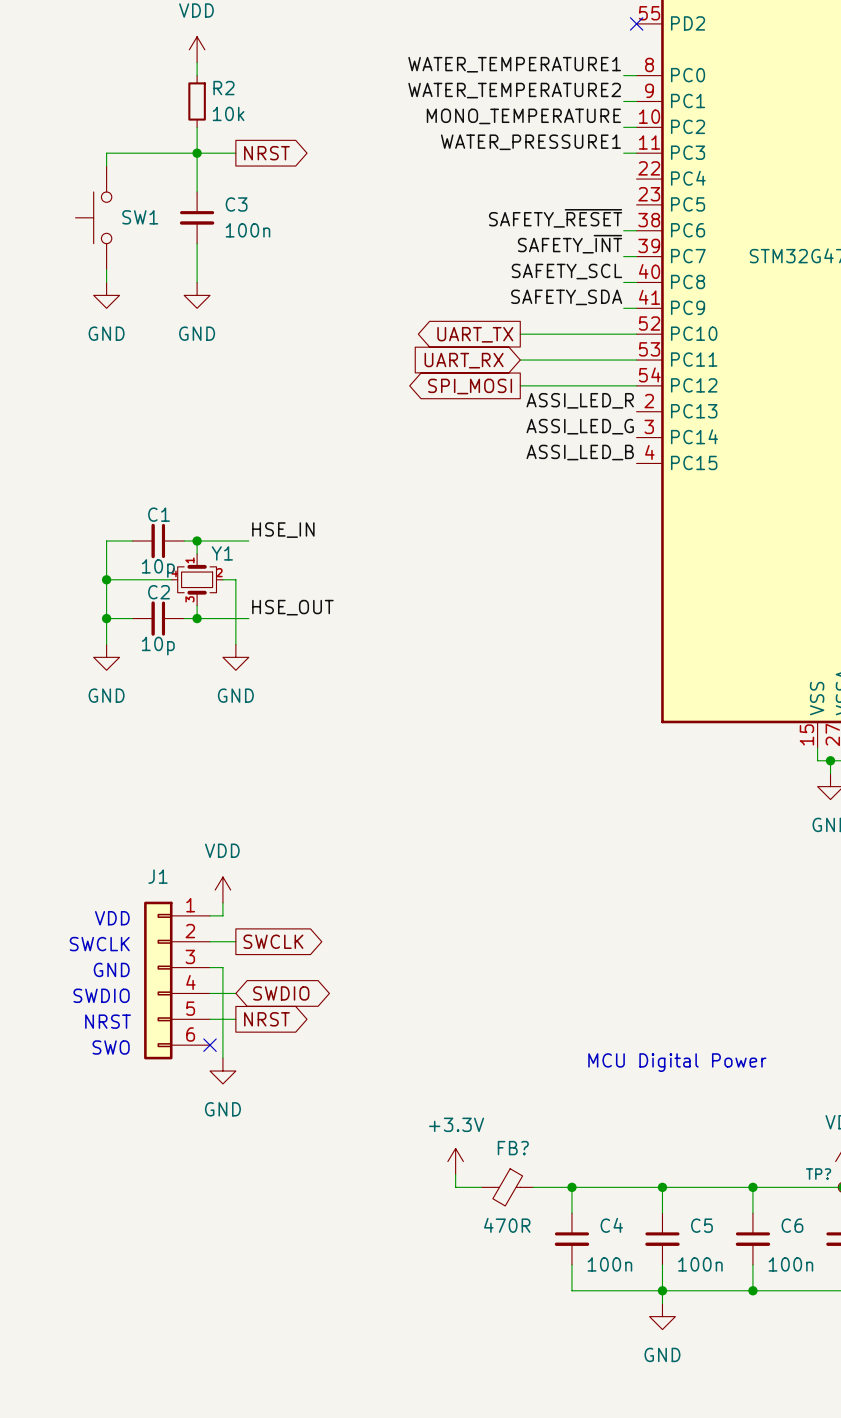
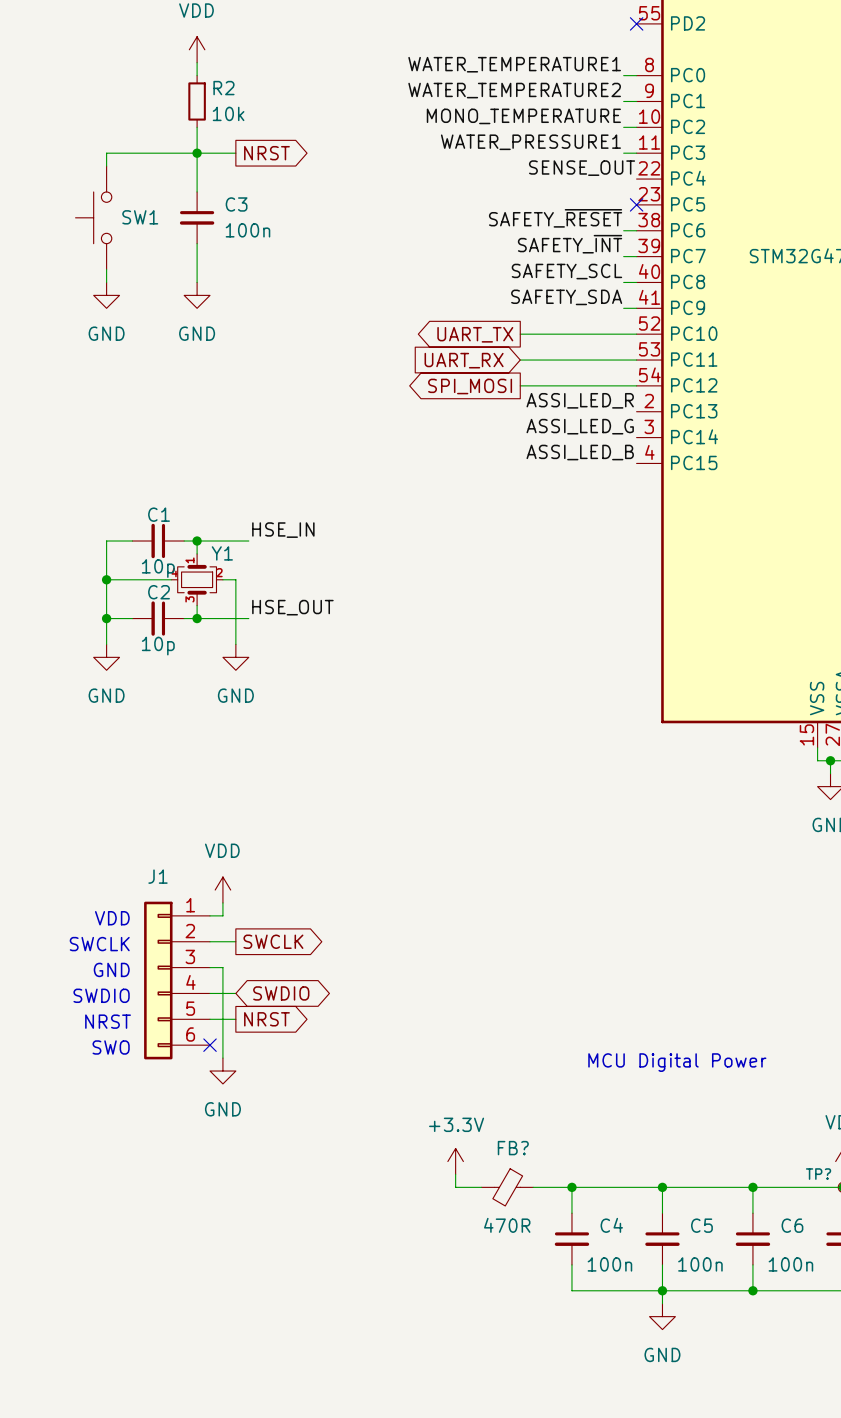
label: none -> SENSE_OUT (582, 168)
no-connect mark: none -> (636, 204)

